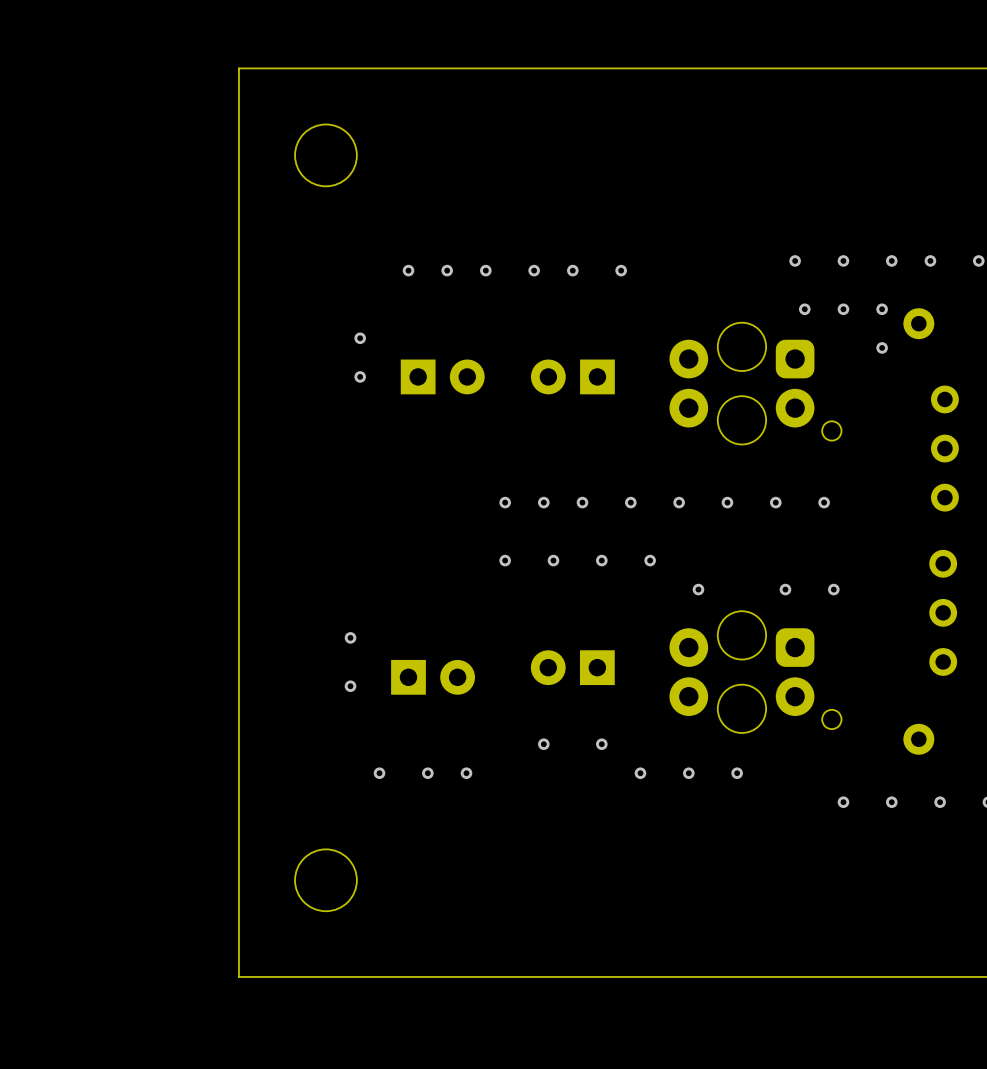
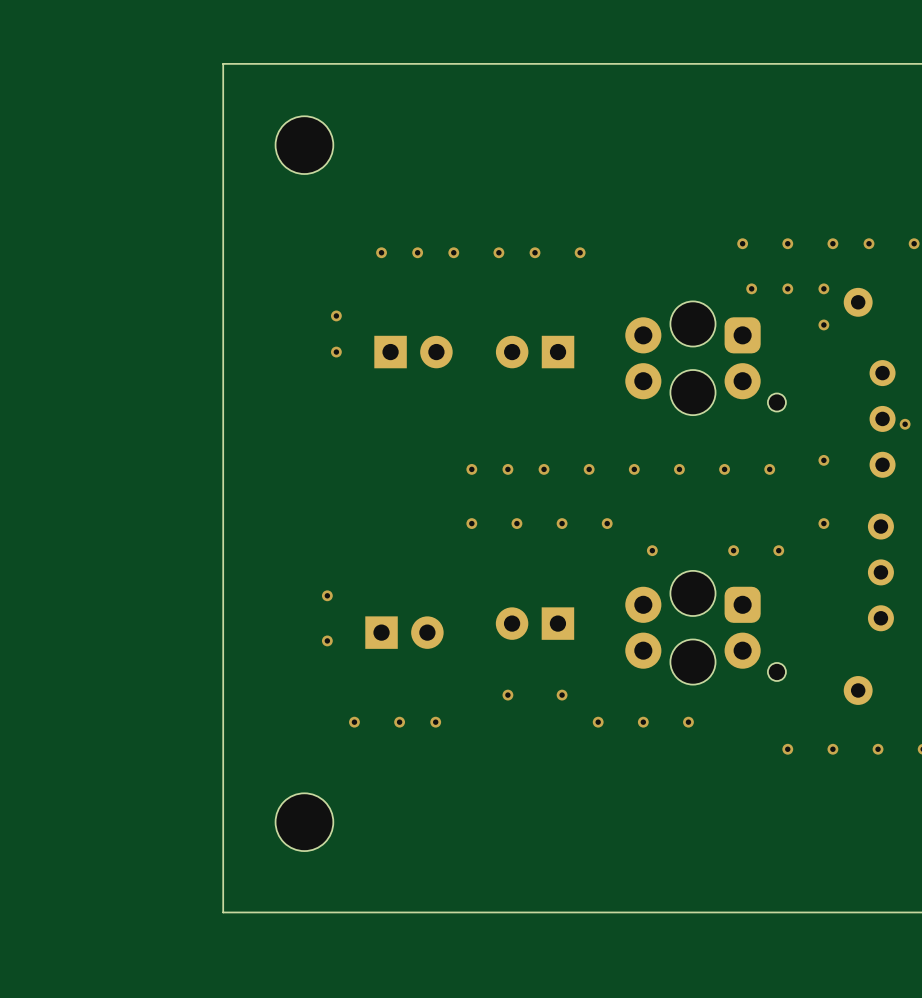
via: none -> (905, 424)
via: none -> (823, 460)
via: none -> (823, 523)

